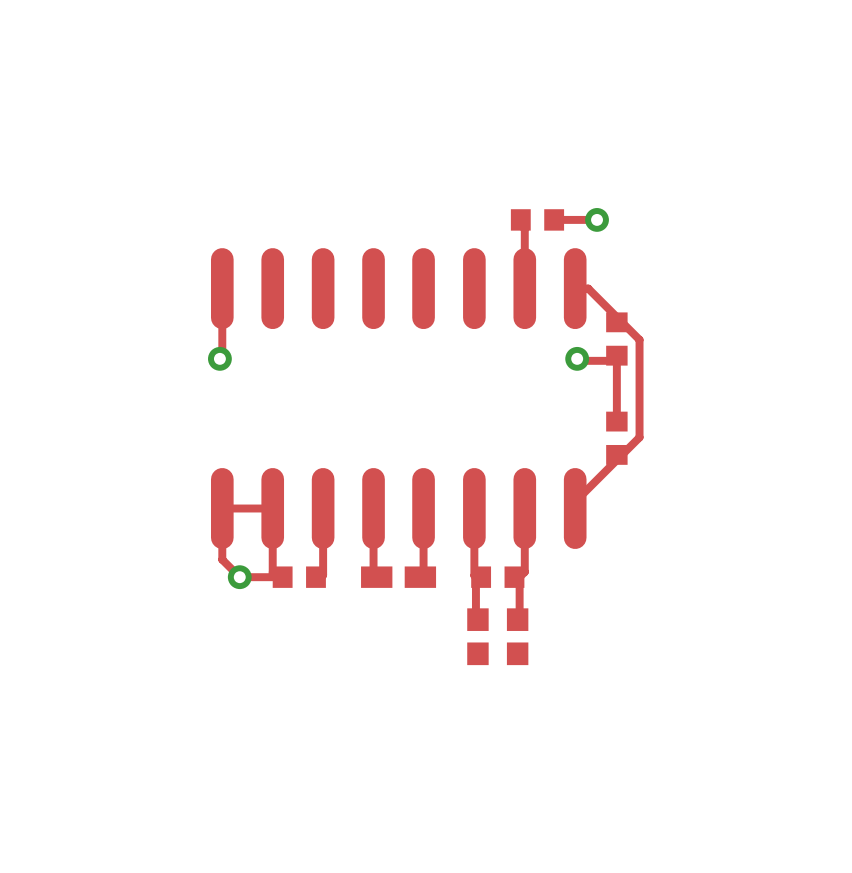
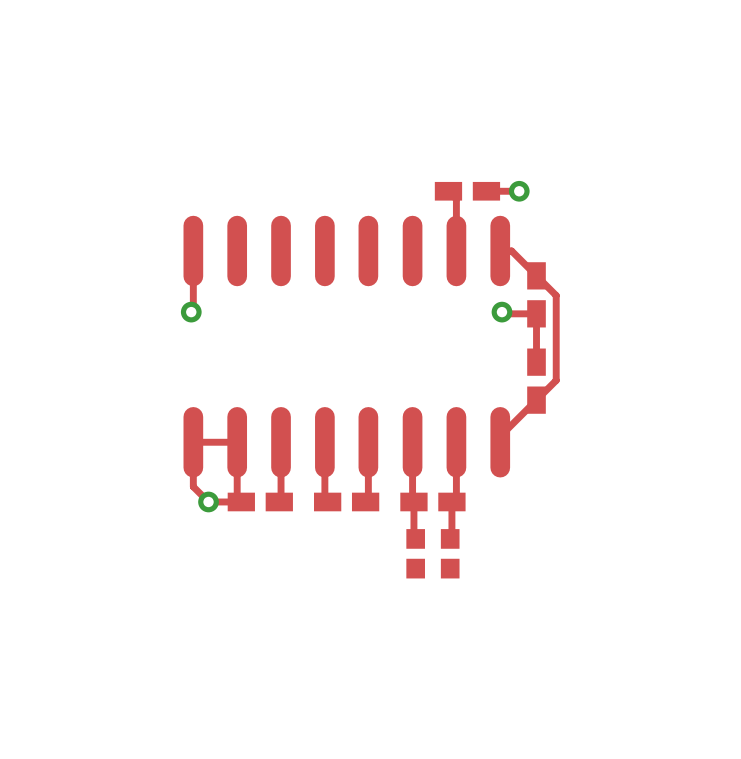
part footprint: [510, 209, 565, 231] -> [434, 181, 501, 201]
part footprint: [606, 312, 628, 366] -> [527, 262, 546, 328]
part footprint: [606, 411, 628, 465] -> [527, 348, 546, 414]
part footprint: [272, 566, 326, 588] -> [227, 492, 293, 512]
part footprint: [471, 566, 525, 588] -> [400, 492, 466, 512]

